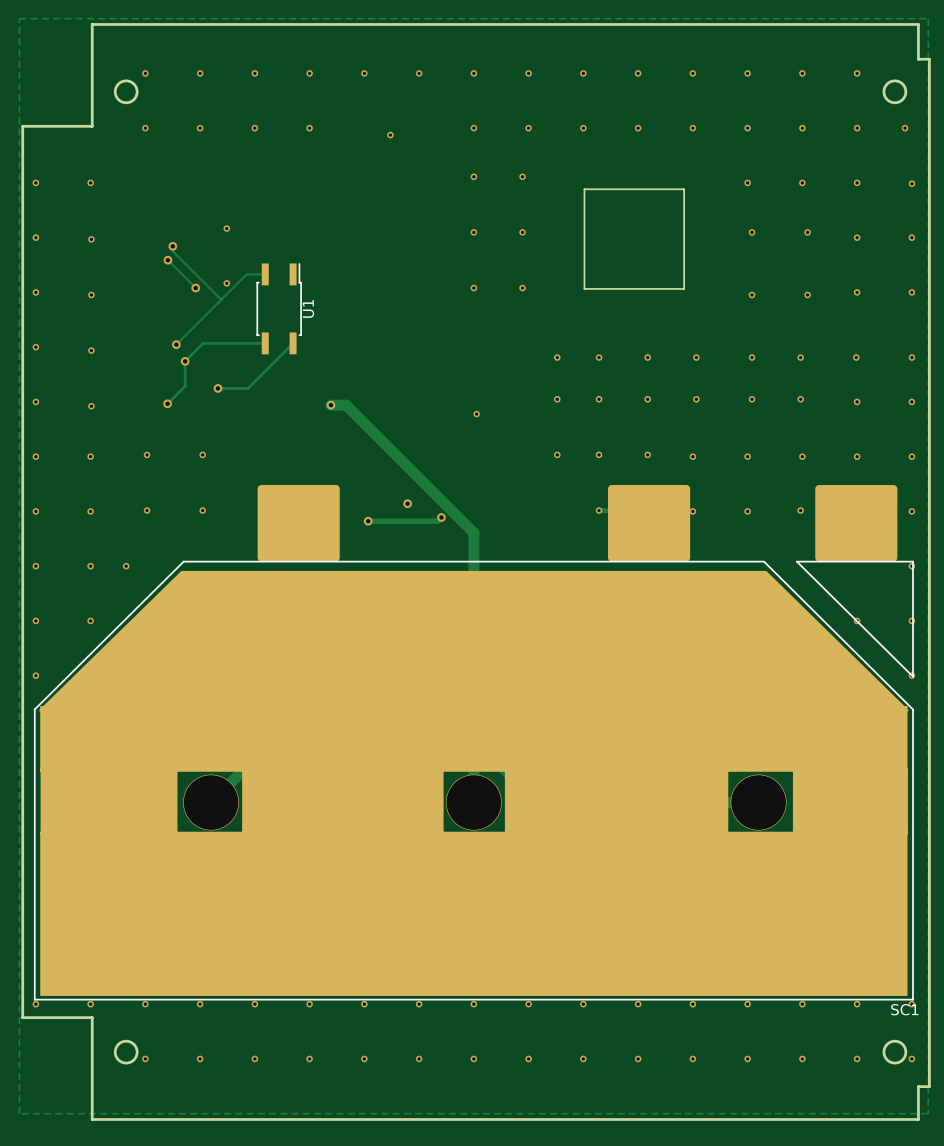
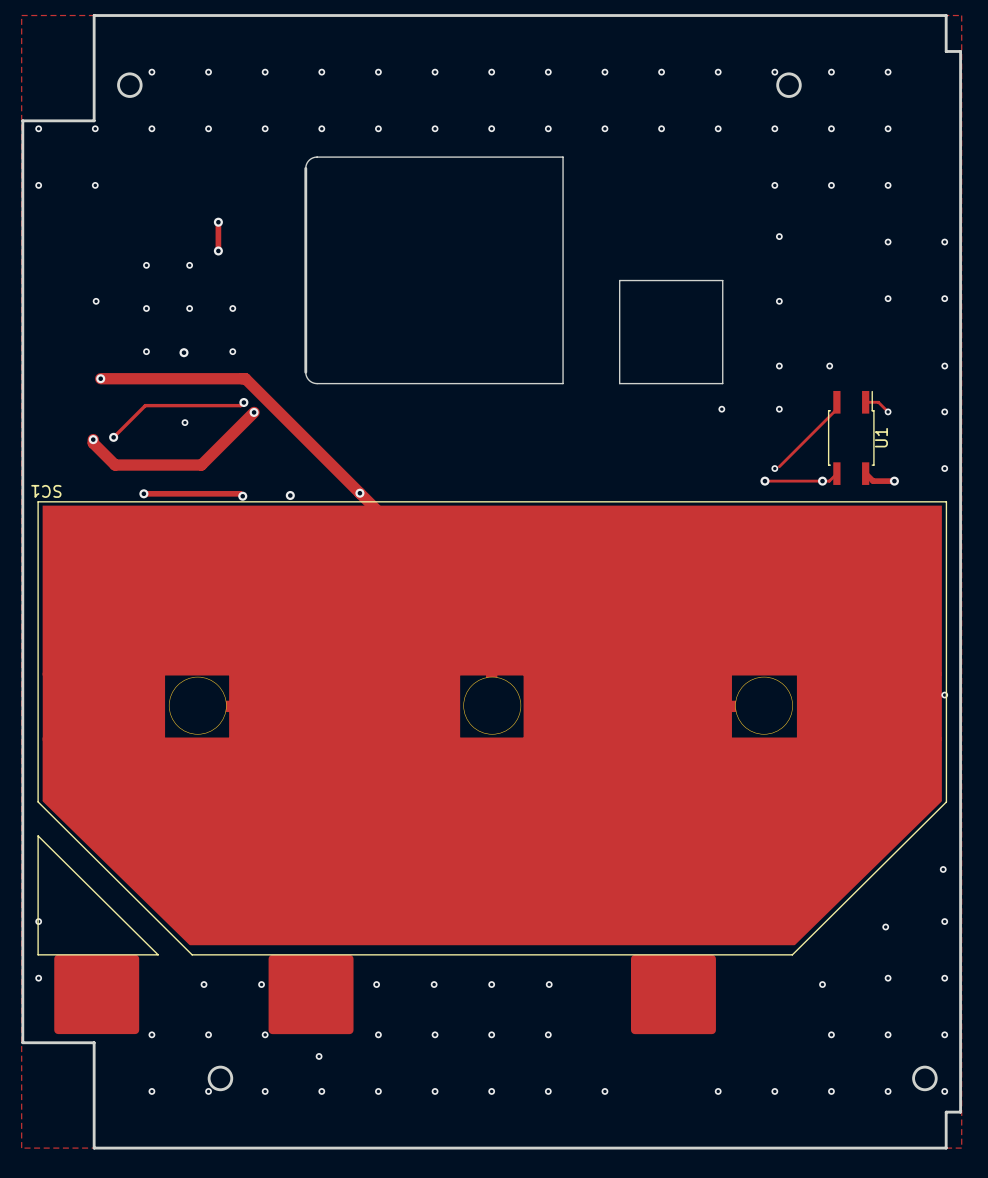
drawing shape: [21, 23, 931, 1121] -> [21, 14, 962, 1150]
via: none -> (38, 128)
via: none -> (95, 128)
via: none -> (378, 128)
via: none -> (435, 128)
via: (904, 128) -> none
via: (390, 135) -> none
via: (473, 176) -> none
via: (522, 176) -> none
via: (911, 183) -> none
track: none -> (218, 222) (218, 250)
via: none -> (218, 222)
via: (226, 228) -> none
via: (473, 232) -> none
via: (522, 232) -> none
via: (807, 232) -> none
via: (35, 237) -> none
via: (91, 239) -> none
track: (172, 246) (172, 251) (221, 299) -> none
via: (172, 246) -> none
via: none -> (218, 250)
via: none -> (146, 265)
track: (167, 260) (195, 288) -> none
via: (167, 260) -> none
via: none -> (189, 265)
track: (265, 274) (246, 274) (176, 344) -> none
via position: (226, 283) -> (232, 308)
via: (195, 288) -> none
via: (473, 288) -> none
via: (522, 288) -> none
via: (35, 292) -> none
via: (807, 294) -> none
via: none -> (146, 308)
via: none -> (189, 308)
U1 position: (279, 308) -> (851, 437)
via: none -> (146, 351)
via: none -> (232, 351)
track: (265, 343) (203, 343) (185, 361) (185, 386) -> none
track: (293, 343) (248, 388) (217, 388) -> none
via: (35, 347) -> none
via: (91, 350) -> none
via: (557, 357) -> none
via: (599, 357) -> none
via: (647, 357) -> none
via: (696, 357) -> none
via: (856, 357) -> none
via: (185, 361) -> none
via: none -> (100, 378)
track: (185, 386) (167, 403) -> none
via: (217, 388) -> none
track: none -> (243, 402) (240, 405) (145, 405) (113, 437)
via: none -> (243, 402)
track: none -> (836, 402) (836, 409) (779, 466)
track: none -> (865, 402) (878, 402) (888, 411)
via: (557, 399) -> none
via: (599, 399) -> none
via: (647, 399) -> none
via: (800, 399) -> none
via: (35, 401) -> none
track: none -> (254, 412) (201, 465) (115, 465) (93, 443) (93, 439)
via: none -> (254, 412)
via: (167, 403) -> none
track: (330, 405) (346, 405) (473, 532) (473, 575) -> (100, 378) (245, 378) (457, 591) (491, 591)
via: (330, 405) -> none
via: (91, 406) -> none
via: none -> (184, 422)
via: (476, 414) -> none
via: none -> (113, 437)
via: none -> (93, 439)
via: (147, 454) -> none
via: (202, 454) -> none
via: (557, 454) -> none
via: (599, 454) -> none
via: (647, 454) -> none
via: (35, 456) -> none
via: (90, 456) -> none
via: (692, 456) -> none
via: (802, 456) -> none
via: (857, 456) -> none
track: none -> (836, 473) (829, 481) (764, 481)
track: none -> (865, 473) (873, 481) (894, 481)
via: none -> (764, 481)
via: none -> (822, 481)
via: none -> (894, 481)
via: none -> (359, 493)
track: none -> (143, 493) (240, 493) (242, 496)
via: none -> (143, 493)
via: none -> (290, 495)
via: none -> (242, 496)
SC1 footprint: [34, 484, 914, 1001] -> [37, 501, 948, 1035]
via: (407, 503) -> none
via: (147, 510) -> none
via: (202, 510) -> none
via: (599, 510) -> none
via: (800, 510) -> none
via: (35, 511) -> none
via: (90, 511) -> none
via: (692, 511) -> none
via: (747, 511) -> none
via: (911, 511) -> none
track: (441, 517) (437, 521) (368, 521) -> none
via: (441, 517) -> none
via: (368, 521) -> none
via: (35, 566) -> none
via: (90, 566) -> none
via: (126, 566) -> none
via: (911, 566) -> none
via: (35, 620) -> none
via: (90, 620) -> none
via: (857, 620) -> none
via: (911, 620) -> none
via: (35, 675) -> none
via: none -> (943, 869)
via: none -> (38, 921)
via: none -> (944, 921)
via: none -> (885, 927)
via: none -> (38, 978)
via: none -> (888, 978)
via: none -> (944, 978)
via: none -> (204, 984)
via: none -> (261, 984)
via: none -> (376, 984)
via: none -> (434, 984)
via: none -> (491, 984)
via: none -> (549, 984)
via: none -> (822, 984)
via: (35, 1004) -> none
via: (90, 1004) -> none
via position: (309, 1004) -> (319, 1056)
via: (583, 1004) -> none
via: (638, 1004) -> none
via: (692, 1004) -> none
via: (747, 1004) -> none
SC1 name position: SC1 (904, 1009) -> SC1 (46, 491)
via: (638, 1058) -> none

